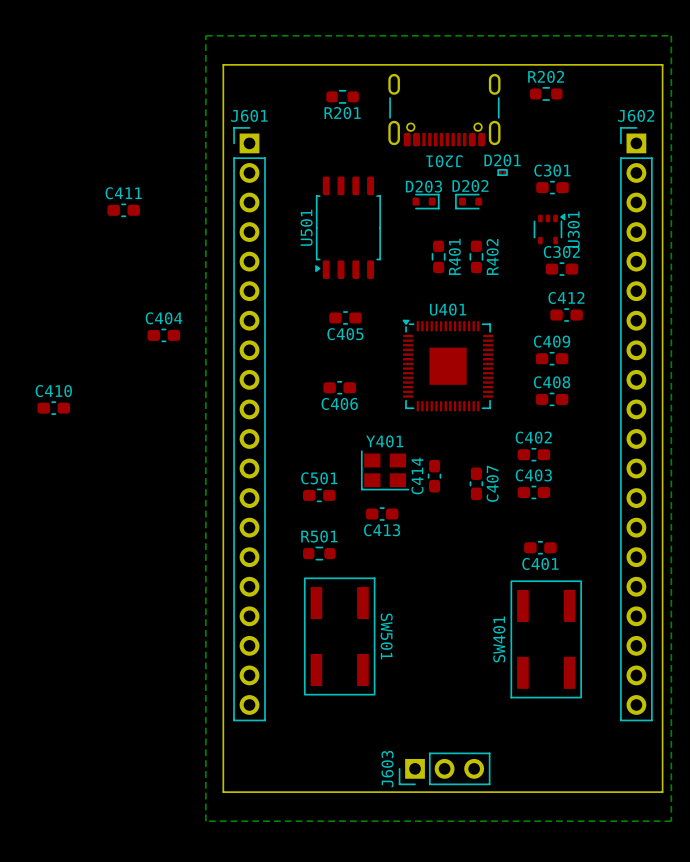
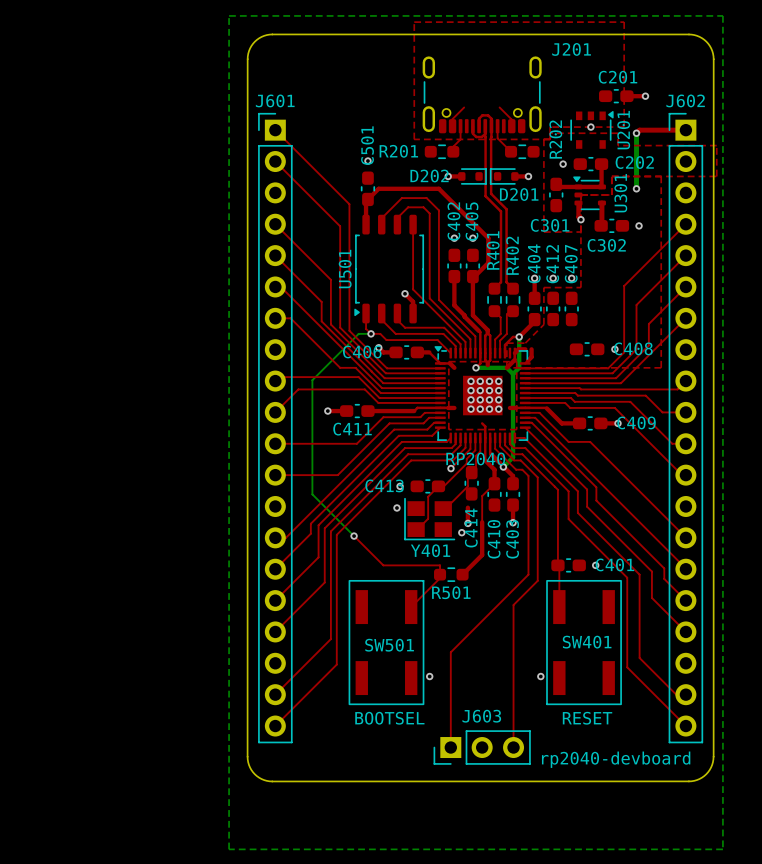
top zone outline: none -> (414, 22) (624, 22) (624, 127) (550, 127) (550, 139) (414, 139) (414, 22)
R202 name rotation: 0° (546, 76) -> 90° counterclockwise (555, 139)
board edge: (662, 76) (662, 64) (223, 64) (223, 792) (662, 792) (662, 733) -> (713, 59) (712, 51) (706, 41) (697, 35) (688, 34) (272, 34) (264, 35) (254, 41) (250, 48) (247, 59) (247, 756) (251, 769) (259, 777) (272, 781) (688, 781)
R202 position: (546, 93) -> (522, 151)
R201 position: (342, 96) -> (442, 151)
C201: none -> (616, 96)
top track: none -> (626, 96) (645, 96)
via: none -> (645, 96)
R201 name position: R201 (342, 113) -> R201 (398, 151)
top track: none -> (464, 107) (452, 119) (452, 126)
top track: none -> (499, 107) (511, 119) (511, 126)
top track: none -> (460, 126) (460, 139) (453, 146) (453, 151)
top track: none -> (472, 126) (472, 133) (476, 137) (481, 137) (485, 133)
top track: none -> (479, 126) (479, 118) (482, 115) (488, 115) (491, 118) (491, 193) (506, 209) (506, 282) (513, 288)
top track: none -> (485, 126) (485, 196) (500, 211) (500, 282) (494, 288)
top track: none -> (497, 126) (497, 138) (511, 151)
via: none -> (590, 127)
top track: none -> (275, 130) (349, 204) (349, 330) (387, 368) (440, 368)
U201: none -> (592, 129)
top track: none -> (685, 130) (639, 130) (636, 133)
top zone outline: none -> (550, 133) (617, 133) (617, 145) (716, 145) (716, 176) (611, 176) (611, 194) (580, 194) (580, 287) (543, 287) (543, 324) (525, 343) (506, 343) (506, 367) (661, 367) (661, 176)
bottom track: none -> (636, 133) (636, 188)
via: none -> (636, 133)
top zone outline: none -> (543, 139) (543, 232) (580, 232)
D201 name position: D201 (502, 160) -> D201 (519, 194)
J201 name rotation: 0° (444, 161) -> 180° (571, 49)
J201 name position: J201 (444, 161) -> J201 (571, 49)
D201 footprint: [497, 169, 508, 176] -> [489, 168, 519, 185]
C301 name position: C301 (552, 170) -> C301 (550, 225)
top track: none -> (275, 161) (340, 226) (340, 327) (385, 373) (440, 373)
via: none -> (367, 161)
via: none -> (563, 164)
C202: none -> (590, 164)
top track: none -> (601, 164) (601, 186) (558, 186) (556, 184)
D202 name position: D202 (470, 186) -> D202 (429, 176)
top track: none -> (448, 176) (461, 176)
via: none -> (448, 176)
top track: none -> (514, 176) (528, 176)
via: none -> (528, 176)
C301 rotation: 0° (552, 187) -> 90° clockwise (556, 194)
C301 position: (552, 187) -> (556, 194)
C411 name position: C411 (123, 193) -> C411 (352, 429)
via: none -> (636, 188)
D203: (425, 201) -> none
D202 rotation: 0° (468, 201) -> 180° (472, 176)
D202 position: (468, 201) -> (472, 176)
C411 position: (123, 210) -> (357, 411)
top track: none -> (578, 203) (578, 217) (580, 219)
top track: none -> (601, 203) (601, 225)
U501 position: (348, 227) -> (389, 269)
via: none -> (580, 219)
U301 rotation: 0° (549, 228) -> 90° counterclockwise (589, 193)
U301 position: (549, 228) -> (589, 193)
top track: none -> (275, 224) (330, 279) (330, 324) (384, 378) (440, 378)
top track: none -> (366, 224) (366, 201) (378, 188) (438, 188) (488, 238) (488, 262) (472, 276) (472, 315) (487, 330) (487, 333)
top track: none -> (381, 224) (381, 218) (401, 198) (426, 198) (438, 210) (438, 299) (475, 336) (475, 353)
top track: none -> (397, 224) (397, 218) (408, 207) (423, 207) (429, 213) (429, 298) (470, 339) (470, 353)
top track: none -> (413, 224) (413, 289) (465, 341) (465, 353)
top track: none -> (685, 224) (624, 285) (624, 352) (608, 368) (525, 368)
via: none -> (639, 225)
via: none -> (454, 238)
via: none -> (472, 238)
R401 position: (438, 256) -> (494, 299)
R402 position: (476, 256) -> (513, 299)
R402 name position: R402 (492, 256) -> R402 (512, 255)
top track: none -> (275, 255) (321, 301) (321, 321) (371, 371)
top track: none -> (685, 255) (636, 304) (636, 349) (612, 373) (525, 373)
C302 position: (561, 269) -> (611, 225)
top track: none -> (454, 276) (454, 305) (478, 330)
top track: none -> (534, 278) (534, 298)
via: none -> (534, 278)
via: none -> (553, 278)
via: none -> (571, 278)
top track: none -> (275, 286) (280, 286) (382, 388) (440, 388)
top track: none -> (685, 286) (648, 324) (648, 345) (616, 378) (525, 378)
top track: none -> (405, 293) (413, 301) (413, 313)
via: none -> (405, 293)
C412 name position: C412 (566, 297) -> C412 (552, 264)
top track: none -> (494, 311) (500, 317) (500, 333) (495, 339) (495, 353)
top track: none -> (510, 311) (506, 314) (506, 333) (500, 340) (500, 353)
C412 rotation: 0° (566, 315) -> 90° clockwise (553, 308)
C412 position: (566, 315) -> (553, 308)
top track: none -> (366, 313) (366, 328) (371, 333) (380, 333) (386, 340) (437, 340) (450, 353)
top track: none -> (381, 313) (381, 319) (395, 333) (443, 333) (455, 346) (455, 353)
top track: none -> (397, 313) (397, 320) (405, 327) (444, 327) (460, 344) (460, 353)
C405 rotation: 0° (345, 317) -> 90° clockwise (472, 265)
C405 position: (345, 317) -> (472, 265)
C404 name position: C404 (163, 318) -> C404 (534, 263)
top track: none -> (275, 318) (290, 318) (340, 367) (355, 367) (380, 393) (440, 393)
top track: none -> (685, 318) (620, 383) (525, 383)
top track: none -> (534, 319) (519, 336) (513, 336) (505, 345) (505, 353)
top track: none -> (479, 330) (480, 363) (476, 367)
C405 name position: C405 (345, 334) -> C405 (472, 221)
top track: none -> (487, 333) (490, 335) (490, 360) (487, 362)
top track: none -> (487, 333) (485, 335) (485, 360) (487, 362)
C404 rotation: 0° (163, 335) -> 90° clockwise (534, 308)
C404 position: (163, 335) -> (534, 308)
bottom track: none -> (371, 333) (358, 333) (312, 380) (312, 494) (354, 536)
via: none -> (371, 333)
bottom track: none -> (519, 336) (519, 367) (513, 374)
via: none -> (519, 336)
C409 name position: C409 (552, 341) -> C409 (636, 422)
top track: none -> (378, 347) (383, 352) (396, 352)
via: none -> (378, 347)
top track: none -> (525, 349) (518, 349) (514, 353) (514, 359) (506, 367)
top track: none -> (531, 349) (531, 357) (525, 363)
via: none -> (614, 349)
top track: none -> (417, 352) (429, 352) (440, 363) (449, 363) (454, 367)
C409 position: (552, 358) -> (590, 423)
top zone outline: none -> (448, 361) (516, 361) (516, 429) (448, 429) (448, 361)
top track: none -> (487, 362) (487, 365)
U401: (447, 365) -> none
bottom track: none -> (476, 367) (506, 367) (513, 374)
via: none -> (476, 367)
top track: none -> (371, 371) (383, 383) (440, 383)
bottom track: none -> (513, 374) (513, 457) (503, 467)
top track: none -> (275, 381) (279, 377) (358, 377) (379, 398) (440, 398)
top track: none -> (685, 381) (677, 389) (525, 388)
via: none -> (470, 381)
via: none -> (480, 381)
via: none -> (489, 381)
via: none -> (498, 381)
C408 name position: C408 (552, 382) -> C408 (633, 348)
C406 position: (339, 387) -> (406, 352)
via: none -> (470, 390)
via: none -> (480, 390)
via: none -> (489, 390)
via: none -> (498, 390)
C410 name position: C410 (53, 391) -> C410 (494, 539)
top track: none -> (525, 393) (645, 395) (662, 412) (685, 412)
part: none -> (482, 394)
top track: none -> (525, 398) (570, 398) (574, 401) (630, 401) (672, 443) (685, 443)
via: none -> (470, 399)
via: none -> (480, 399)
via: none -> (489, 399)
via: none -> (498, 399)
C408 position: (552, 399) -> (587, 349)
top track: none -> (440, 402) (378, 402) (364, 389) (298, 389) (275, 412)
top track: none -> (525, 402) (565, 402) (570, 407) (614, 407) (682, 475) (685, 475)
C406 name position: C406 (339, 403) -> C406 (362, 351)
top track: none -> (448, 407) (417, 407) (414, 411) (367, 411)
top track: none -> (448, 407) (454, 407)
top track: none -> (509, 407) (516, 407)
top track: none -> (516, 407) (546, 407)
top track: none -> (546, 408) (561, 423) (579, 423)
via: none -> (470, 409)
via: none -> (480, 409)
via: none -> (489, 409)
via: none -> (498, 409)
C410 rotation: 0° (53, 408) -> 90° clockwise (494, 494)
C410 position: (53, 408) -> (494, 494)
top track: none -> (327, 411) (346, 411)
via: none -> (327, 411)
top track: none -> (440, 412) (424, 412) (420, 417) (383, 417) (356, 443) (275, 443)
top track: none -> (525, 412) (539, 412) (568, 441) (590, 441) (685, 537)
top track: none -> (440, 417) (429, 417) (423, 423) (389, 423) (337, 475) (275, 475)
top track: none -> (525, 417) (535, 417) (685, 569)
top track: none -> (440, 422) (434, 422) (427, 429) (394, 429) (285, 537) (275, 537)
top track: none -> (482, 423) (485, 426) (485, 460) (494, 469) (494, 483) (482, 496) (482, 555) (462, 574)
top track: none -> (525, 422) (531, 422) (596, 487) (596, 500) (664, 568) (664, 578) (685, 600)
top track: none -> (600, 423) (617, 423)
via: none -> (617, 423)
top track: none -> (440, 427) (432, 435) (398, 435) (310, 523) (310, 533) (275, 569)
top track: none -> (525, 427) (587, 489) (587, 506) (651, 571) (651, 597) (685, 631)
top track: none -> (450, 437) (446, 441) (401, 441) (318, 525) (318, 557) (275, 600)
top track: none -> (455, 437) (455, 444) (451, 448) (405, 448) (324, 528) (324, 582) (275, 631)
top track: none -> (460, 437) (460, 445) (451, 454) (408, 454) (330, 531) (330, 639) (275, 694)
top track: none -> (465, 437) (465, 447) (452, 460) (411, 460) (336, 534) (336, 664) (275, 726)
top track: none -> (470, 437) (470, 449) (450, 468)
top track: none -> (475, 437) (475, 450) (466, 458) (466, 463) (443, 486) (438, 486) (428, 496) (428, 518) (416, 529)
top track: none -> (480, 437) (480, 451) (476, 455) (476, 469) (467, 477) (467, 486) (445, 508) (443, 508)
top track: none -> (490, 437) (490, 454)
top track: none -> (495, 437) (495, 448) (516, 469) (522, 469) (528, 475) (528, 574) (450, 652) (450, 747)
top track: none -> (500, 437) (500, 446) (514, 460) (520, 460) (537, 477) (537, 580) (513, 605) (513, 747)
top track: none -> (505, 437) (505, 445) (513, 454) (522, 454) (557, 489) (559, 607)
top track: none -> (509, 437) (509, 444) (513, 448) (525, 448) (568, 491) (568, 519) (627, 577) (627, 667) (685, 726)
top track: none -> (514, 437) (524, 437) (577, 491) (577, 512) (639, 574) (639, 658) (676, 694) (685, 694)
C402 name position: C402 (533, 437) -> C402 (453, 221)
Y401 name position: Y401 (384, 441) -> Y401 (430, 550)
top track: none -> (491, 454) (513, 476) (513, 483)
text: none -> RP2040 (475, 458)
C402 rotation: 0° (533, 454) -> 90° clockwise (454, 265)
C402 position: (533, 454) -> (454, 265)
via: none -> (503, 467)
via: none -> (450, 468)
Y401 position: (385, 470) -> (429, 519)
C403 name position: C403 (533, 475) -> C403 (512, 539)
C414 name position: C414 (417, 476) -> C414 (471, 528)
C501 name position: C501 (319, 478) -> C501 (367, 145)
via: none -> (400, 486)
C407 position: (476, 483) -> (571, 308)
C407 name position: C407 (492, 483) -> C407 (571, 264)
C403 rotation: 0° (533, 492) -> 90° clockwise (513, 494)
C403 position: (533, 492) -> (513, 494)
C501 rotation: 0° (319, 495) -> 90° clockwise (367, 188)
C501 position: (319, 495) -> (367, 188)
top track: none -> (513, 505) (513, 522)
via: none -> (396, 507)
top track: none -> (467, 507) (467, 523)
via: none -> (513, 522)
C413 position: (382, 514) -> (427, 486)
via: none -> (467, 523)
via: none -> (461, 532)
top track: none -> (354, 536) (383, 565) (440, 565) (440, 578) (411, 607)
via: none -> (354, 536)
C413 name position: C413 (382, 530) -> C413 (384, 485)
R501 name position: R501 (319, 536) -> R501 (451, 592)
C401 position: (540, 547) -> (568, 565)
R501 position: (319, 553) -> (451, 574)
via: none -> (595, 565)
C401 name position: C401 (540, 563) -> C401 (614, 564)
SW501 position: (339, 636) -> (386, 642)
SW501 name rotation: 0° (386, 636) -> 90° counterclockwise (389, 645)
SW401 name rotation: 0° (499, 639) -> 90° clockwise (587, 642)
SW401 position: (546, 639) -> (584, 642)
via: none -> (429, 676)
via: none -> (540, 676)
text: none -> BOOTSEL (389, 718)
text: none -> RESET (587, 718)
board edge: none -> (713, 756) (711, 767) (706, 774) (699, 778) (688, 781)
text: none -> rp2040-devboard (616, 759)
J603 position: (444, 768) -> (482, 747)
J603 name rotation: 0° (387, 769) -> 90° clockwise (481, 716)
J603 name position: J603 (387, 769) -> J603 (481, 716)

